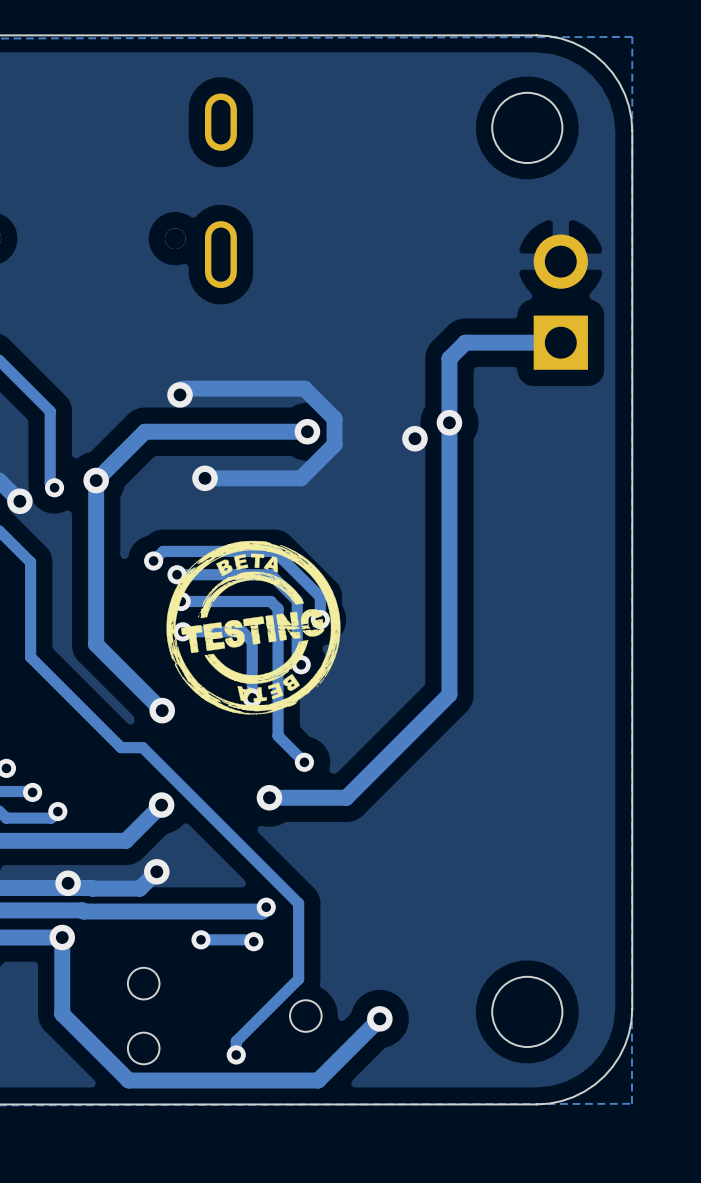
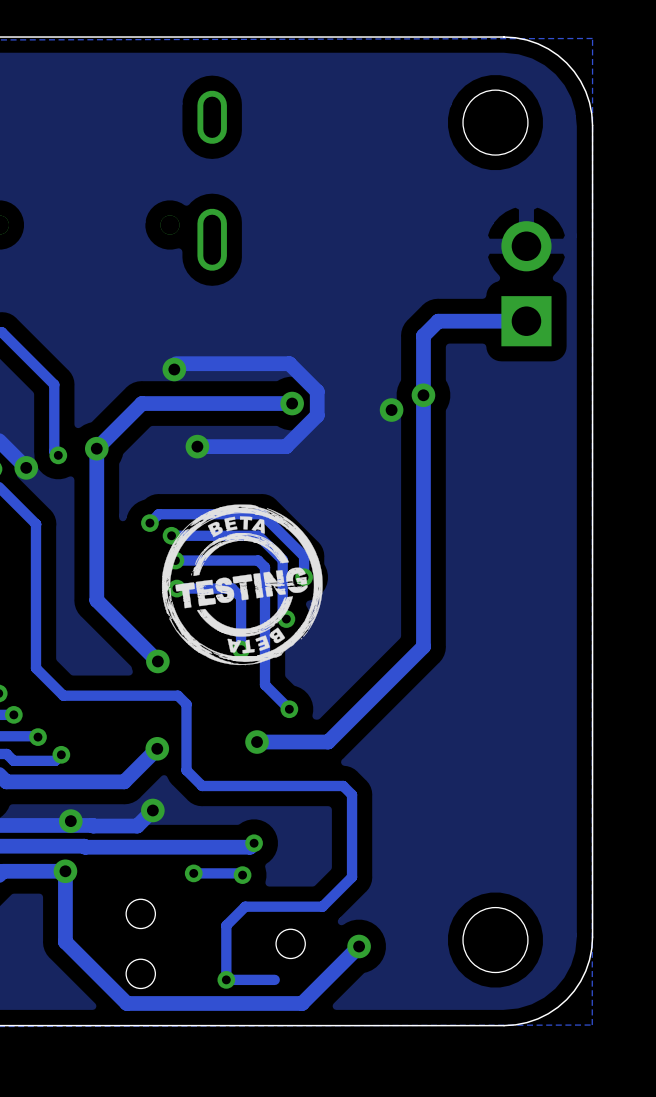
track: (30, 562) (30, 657) (121, 747) -> (35, 524) (35, 668) (63, 695) (119, 695)
track: (142, 747) (298, 903) (298, 979) (236, 1041) -> (139, 695) (177, 695) (186, 704) (186, 770) (202, 785) (343, 785) (352, 794) (352, 877) (322, 906) (245, 906) (226, 925) (226, 967)
track: none -> (274, 979) (226, 979)

